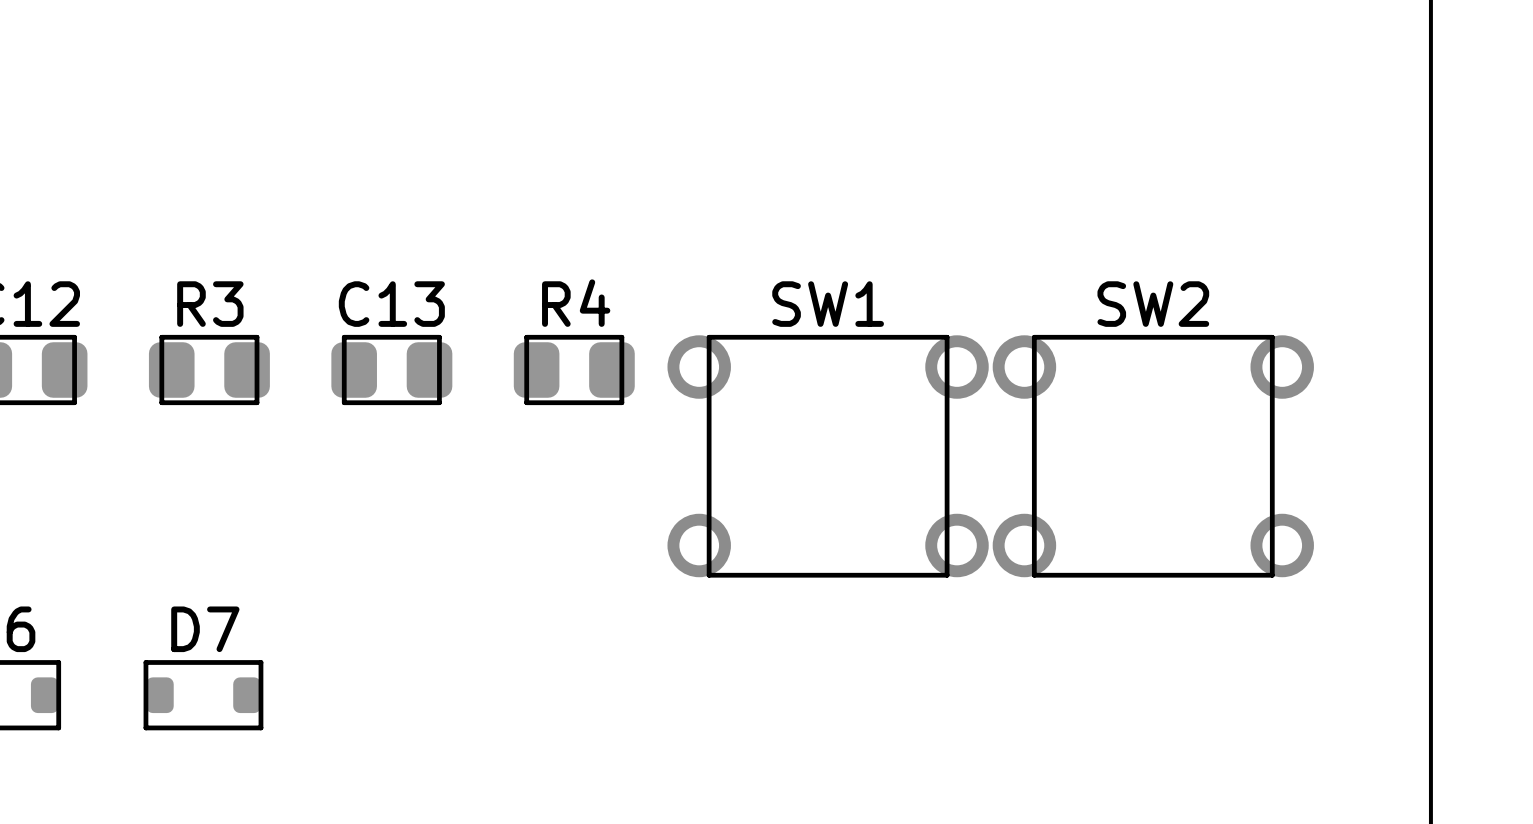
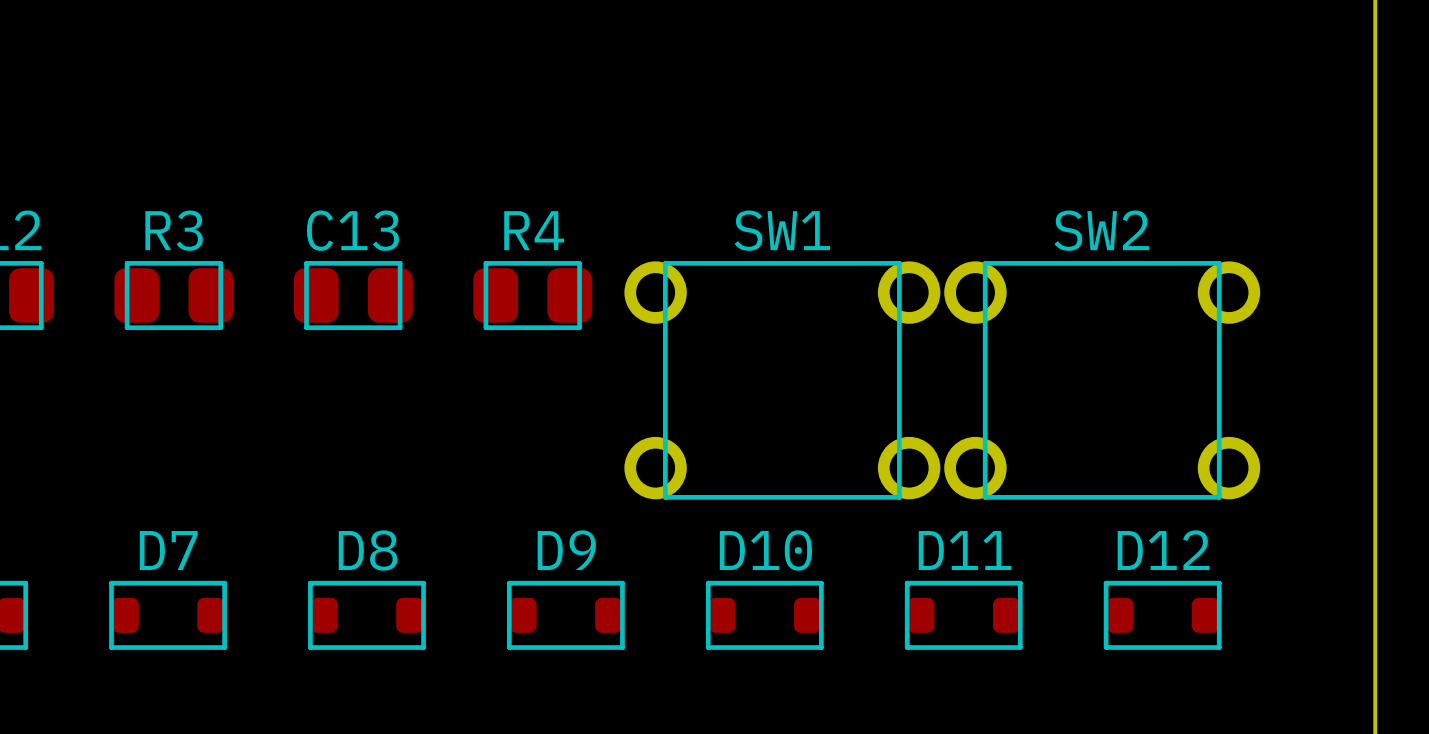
D8: none -> (366, 615)
D9: none -> (565, 615)
D10: none -> (764, 615)
D11: none -> (963, 615)
D12: none -> (1162, 615)

